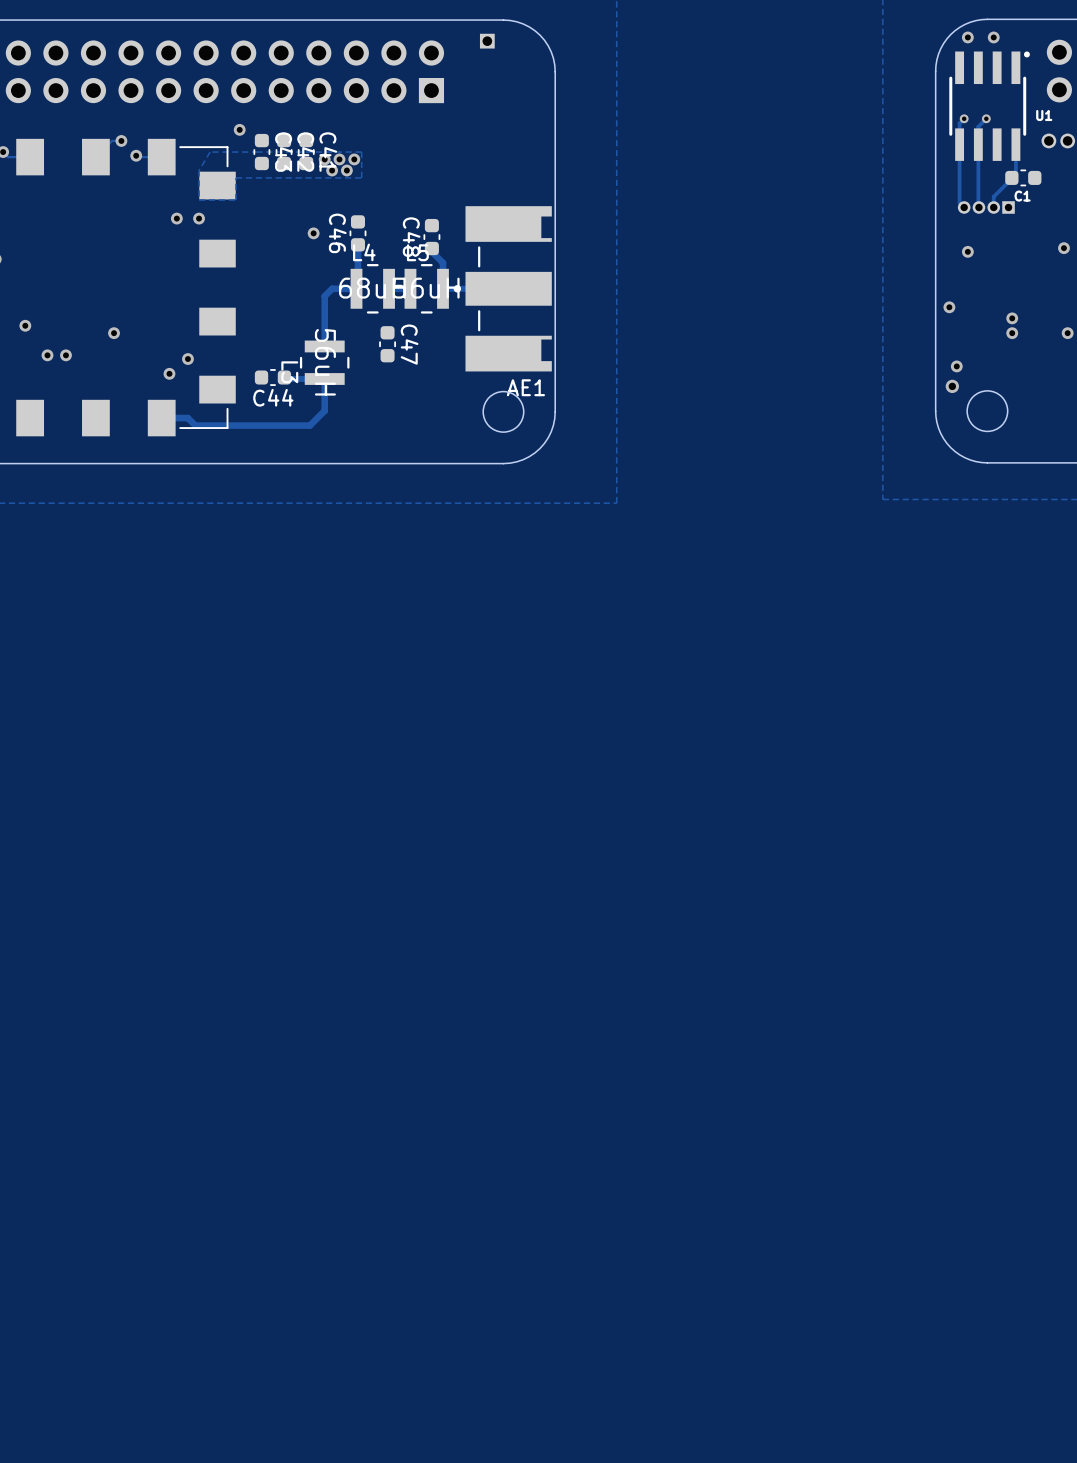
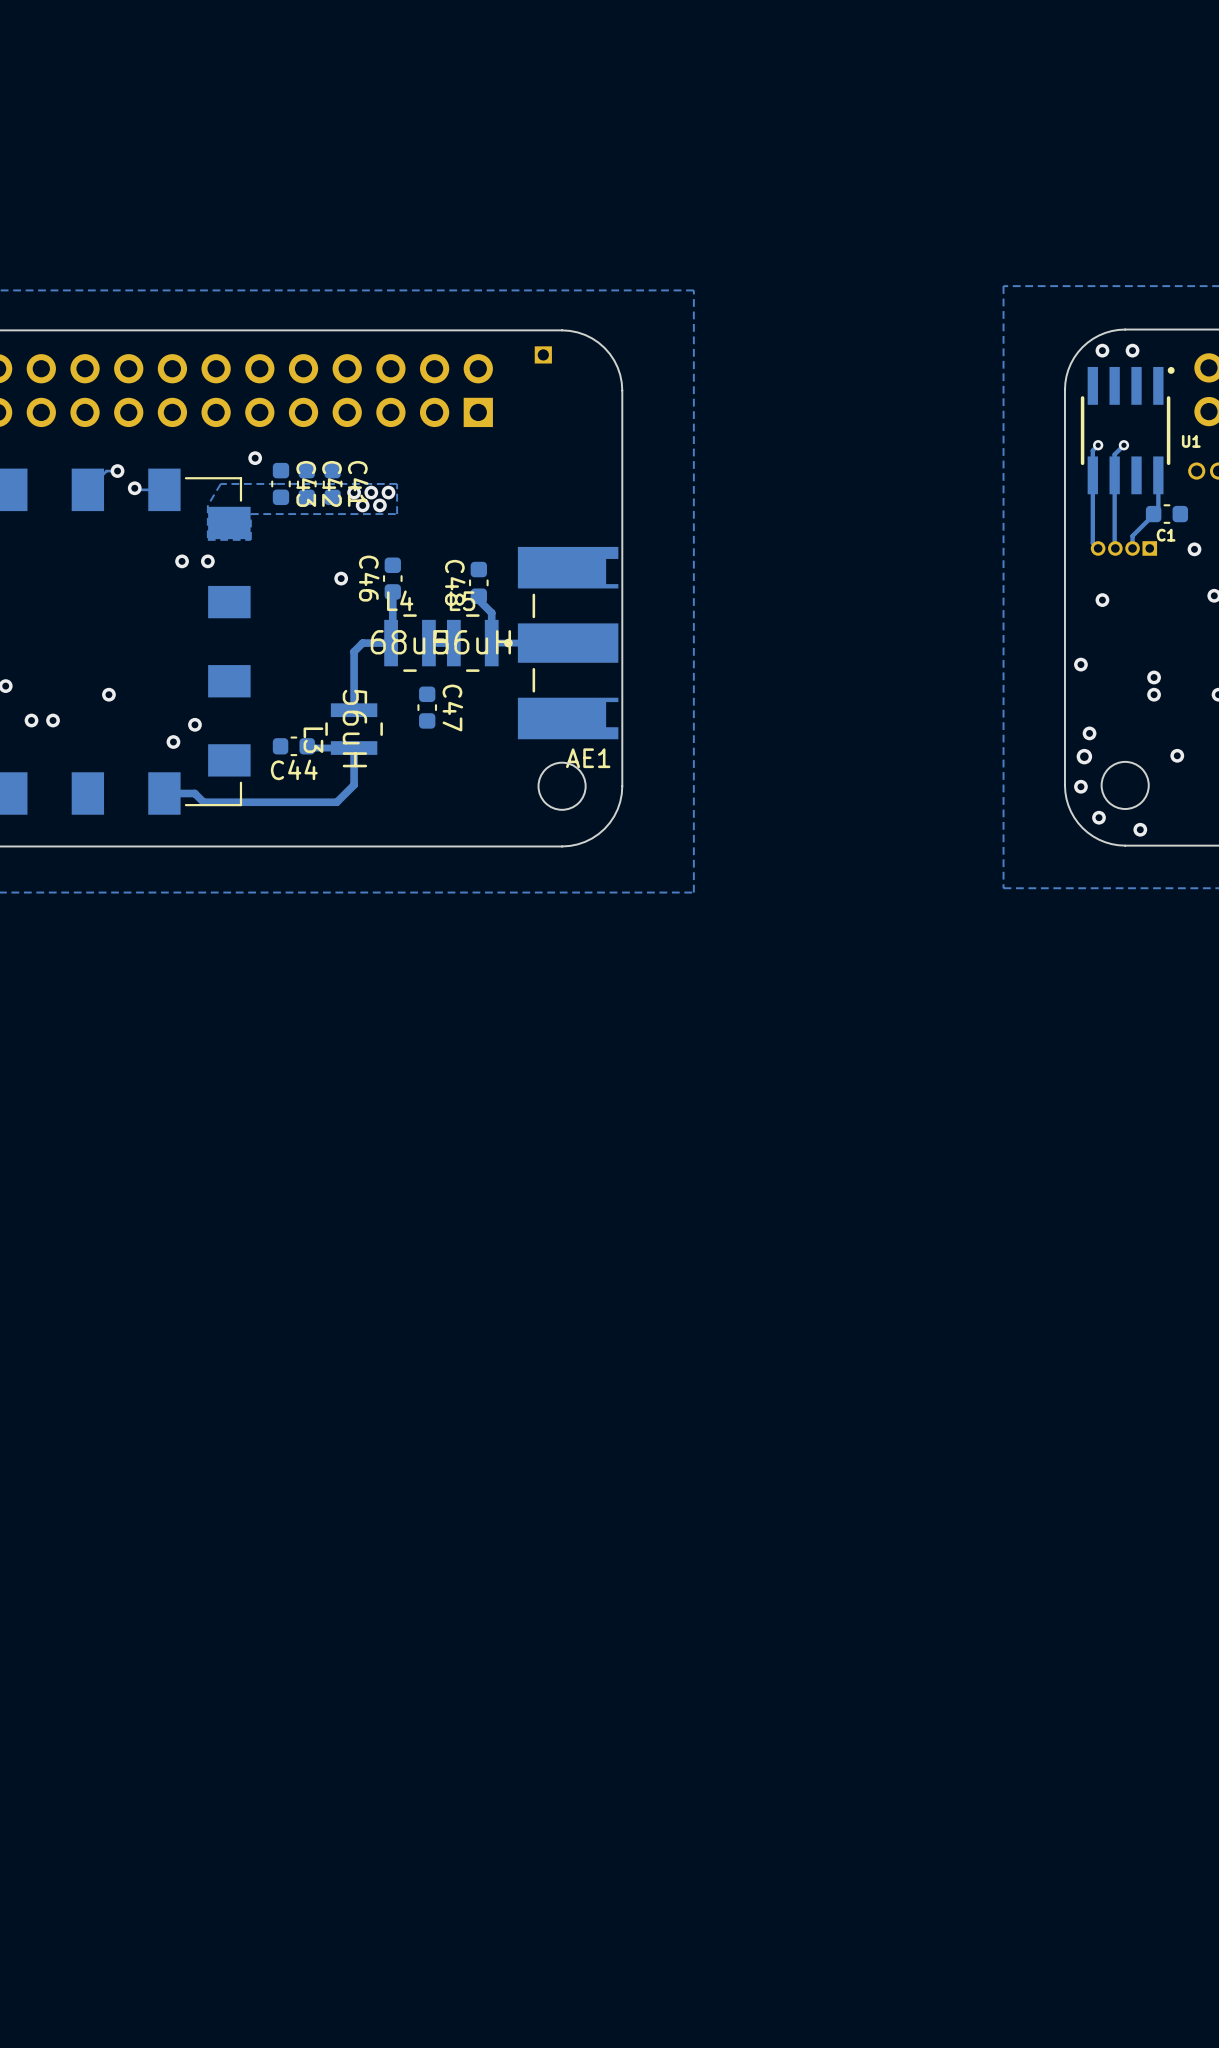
via: none -> (1194, 549)
via: none -> (1177, 755)
via: none -> (1080, 786)
via: none -> (1099, 817)
via: none -> (1140, 829)

